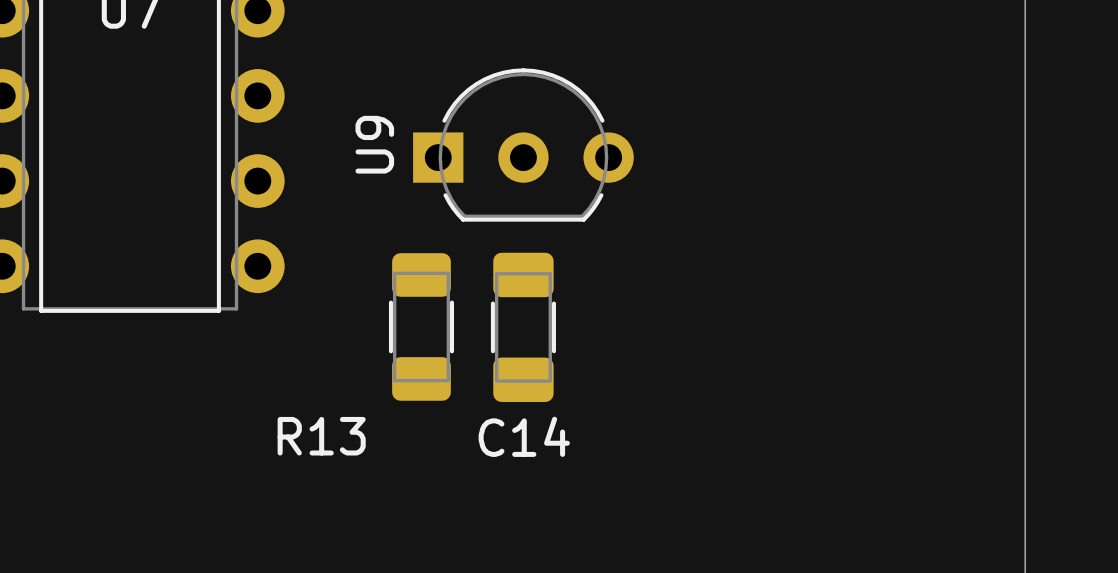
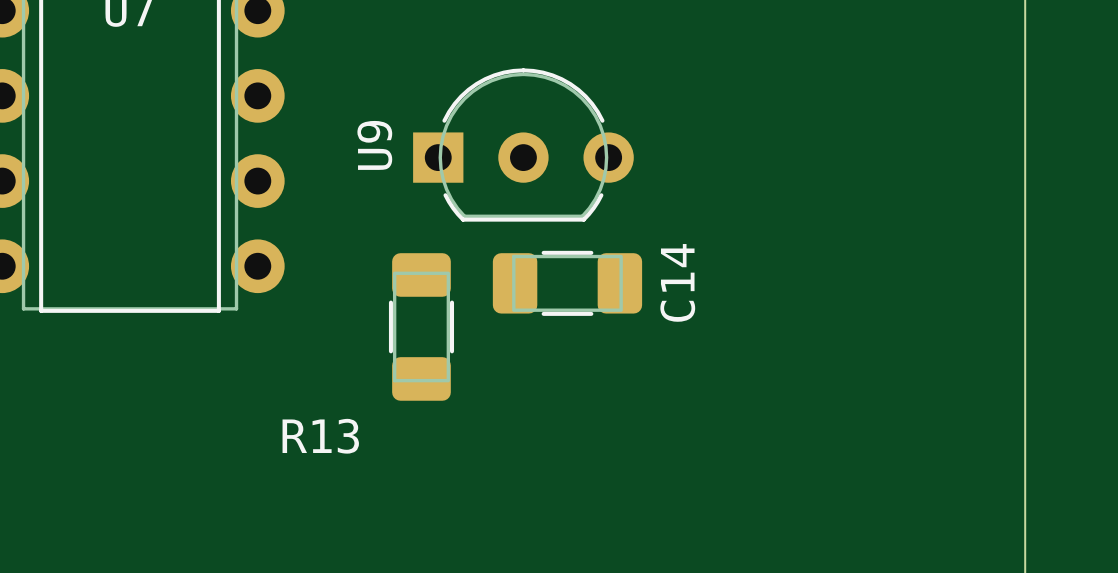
C14 rotation: 0° (523, 327) -> 90° clockwise (567, 283)
C14 name position: C14 (524, 436) -> C14 (677, 282)

